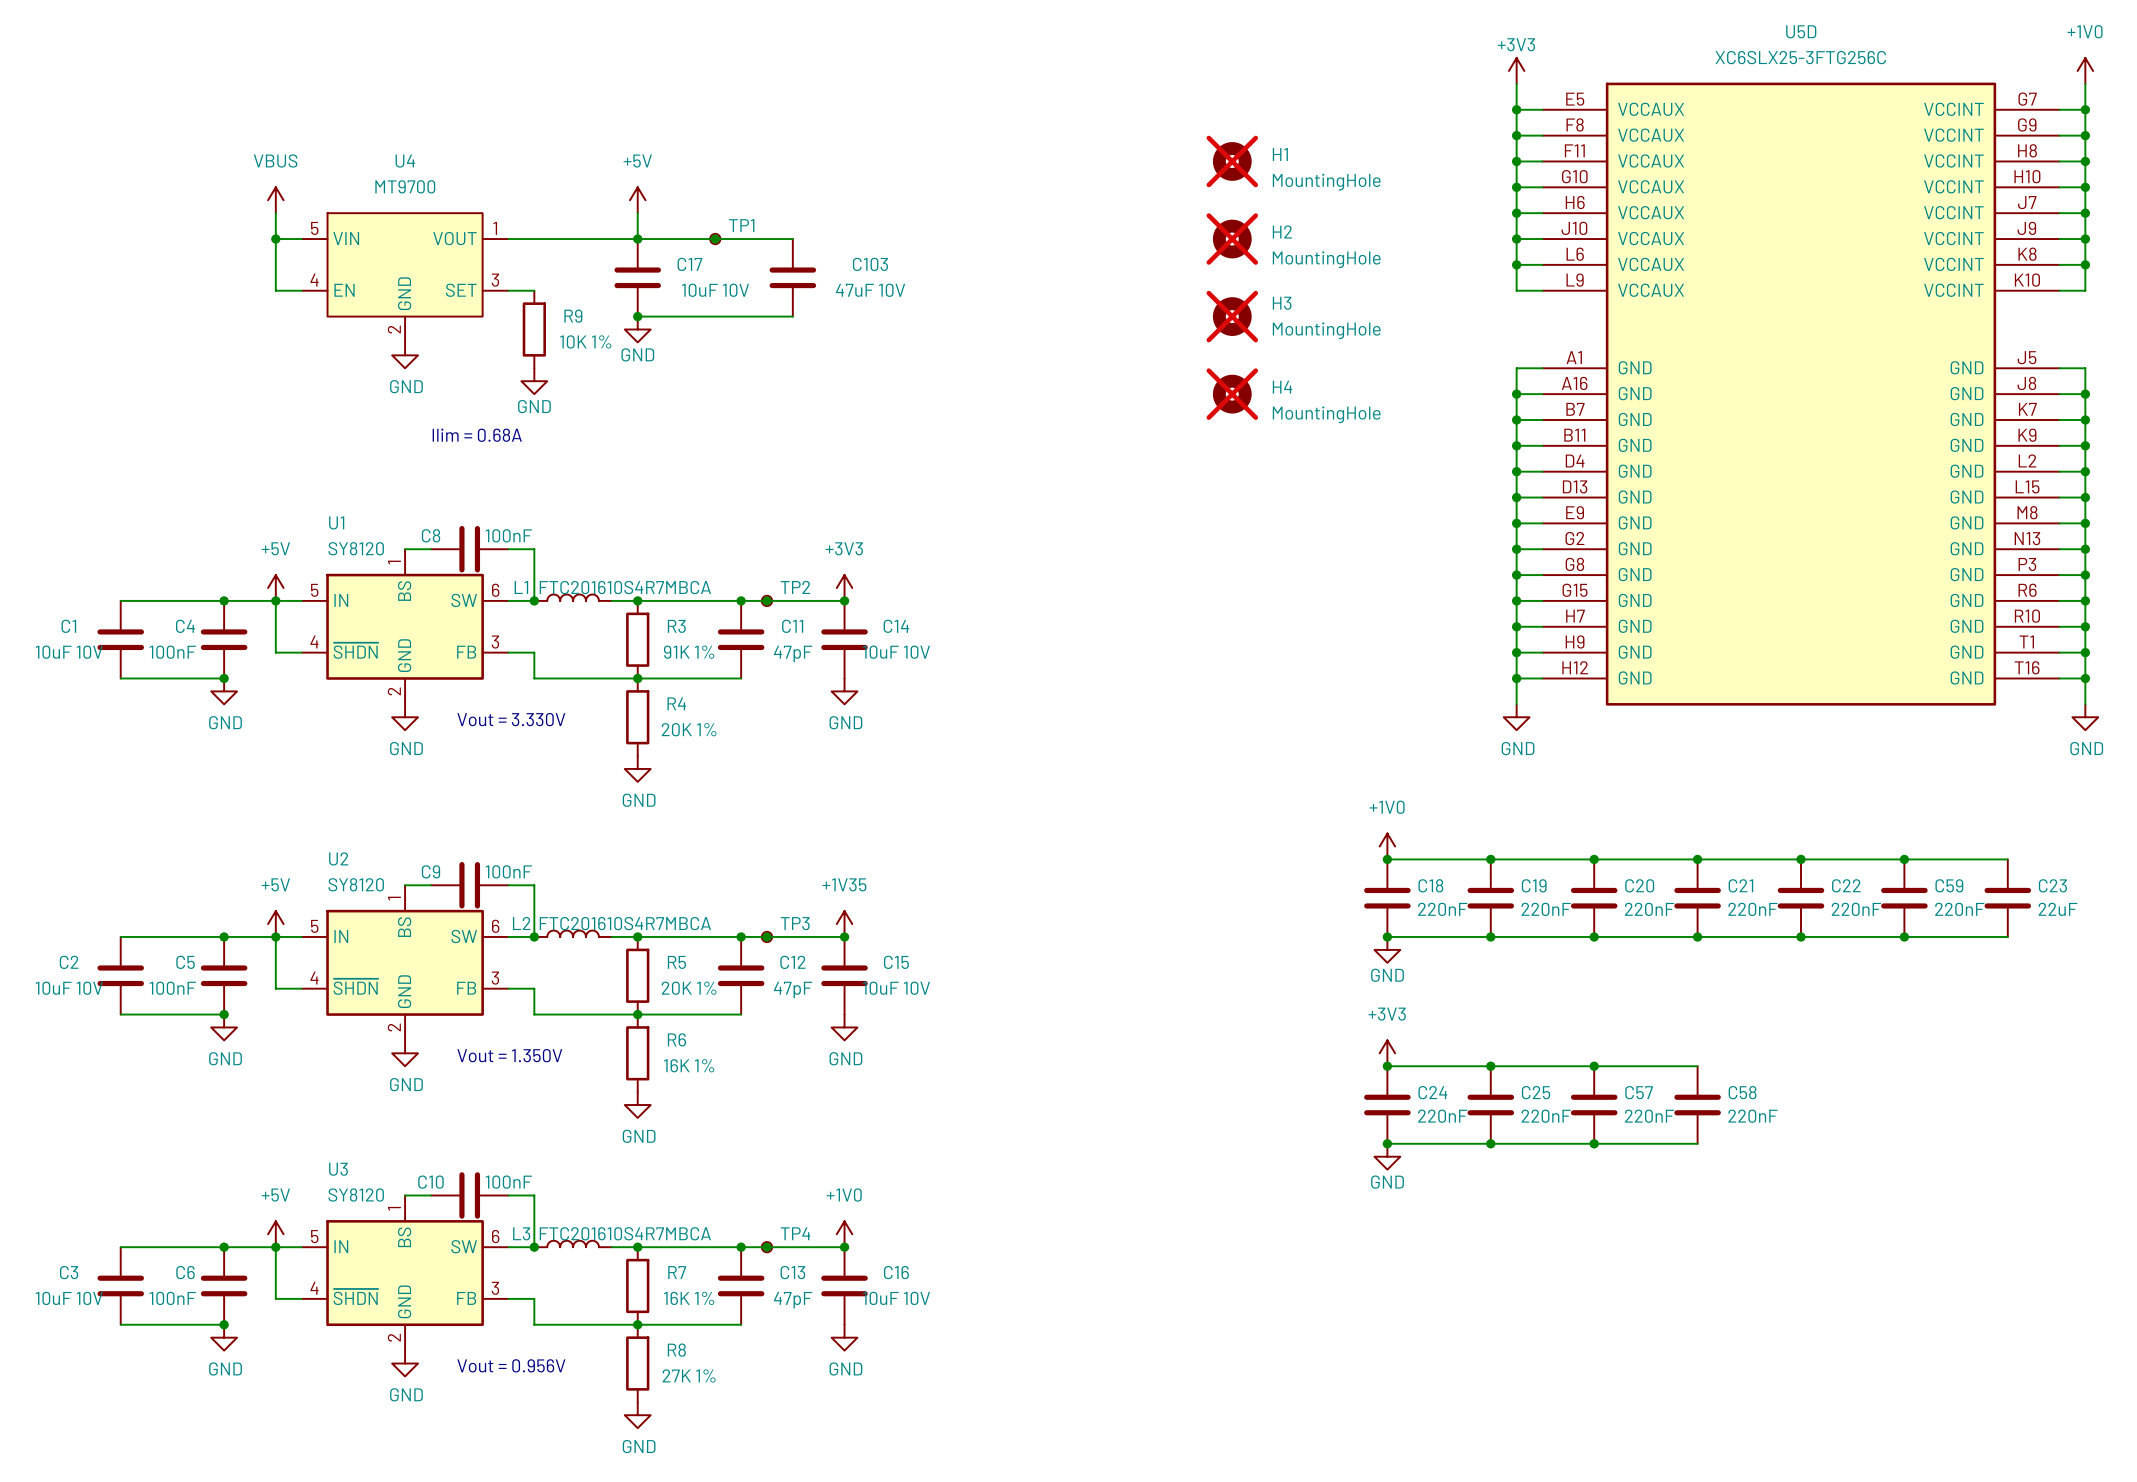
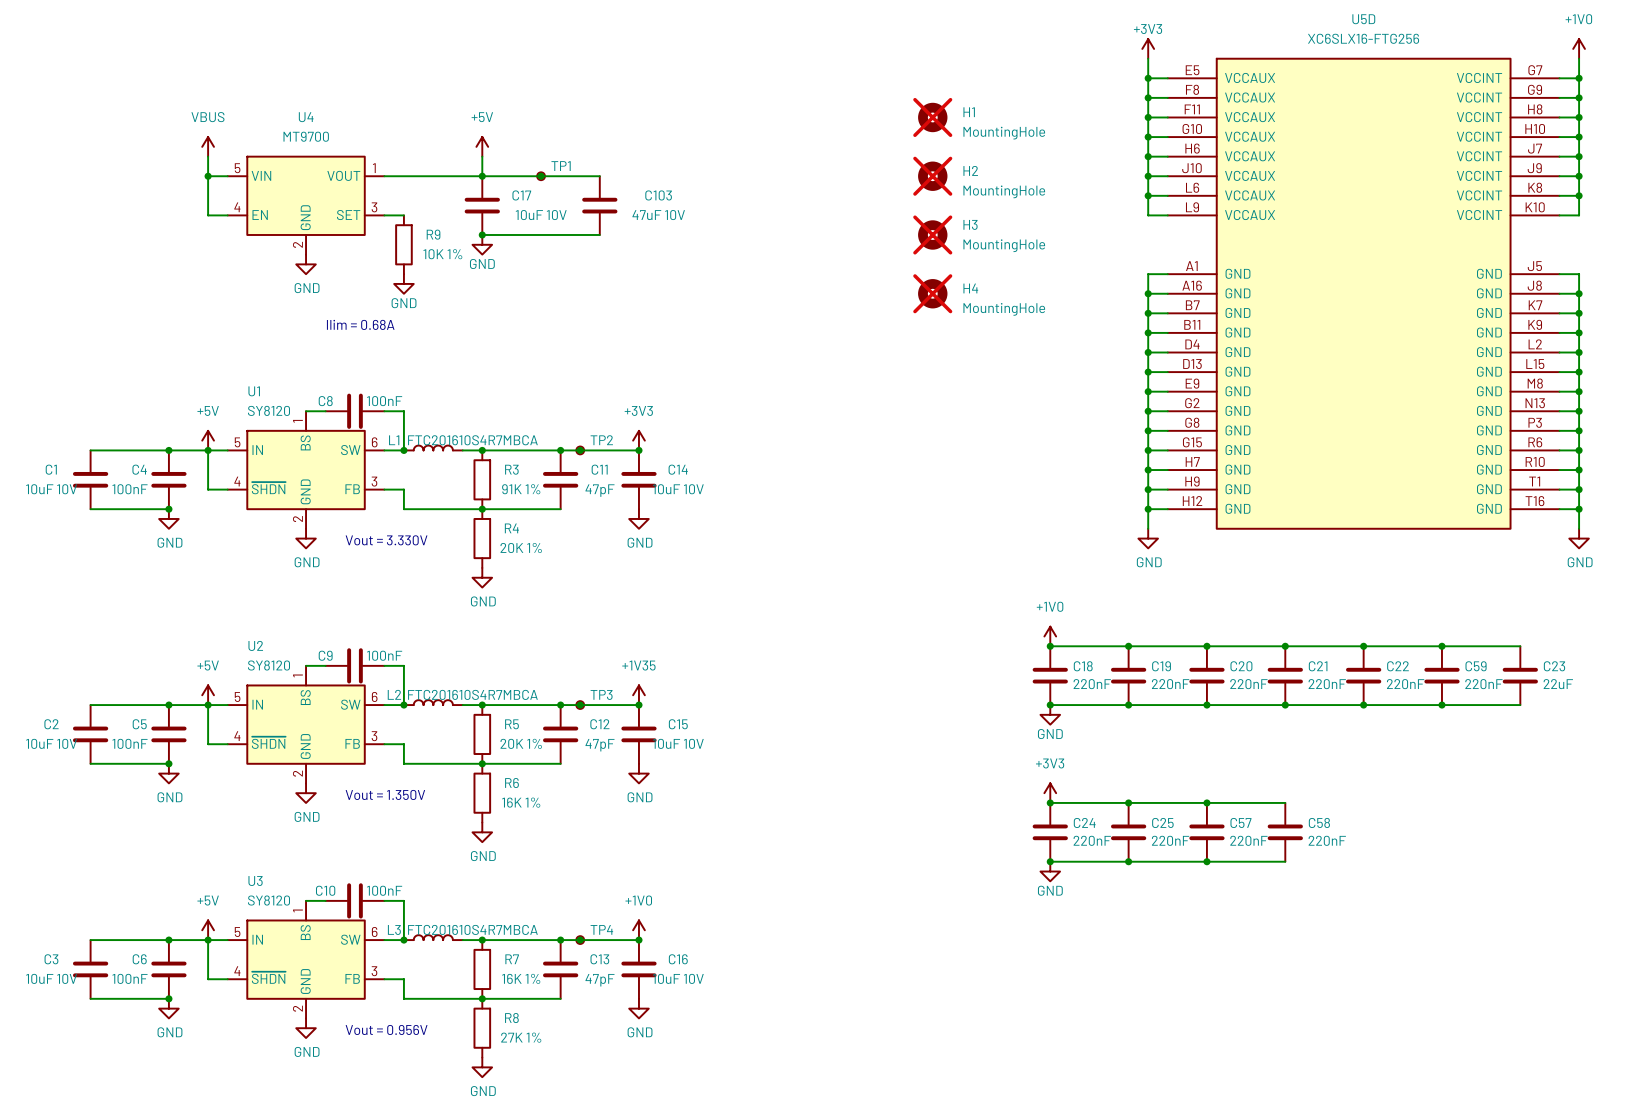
U5D value: XC6SLX25-3FTG256C (1800, 57) -> XC6SLX16-FTG256 (1363, 38)

